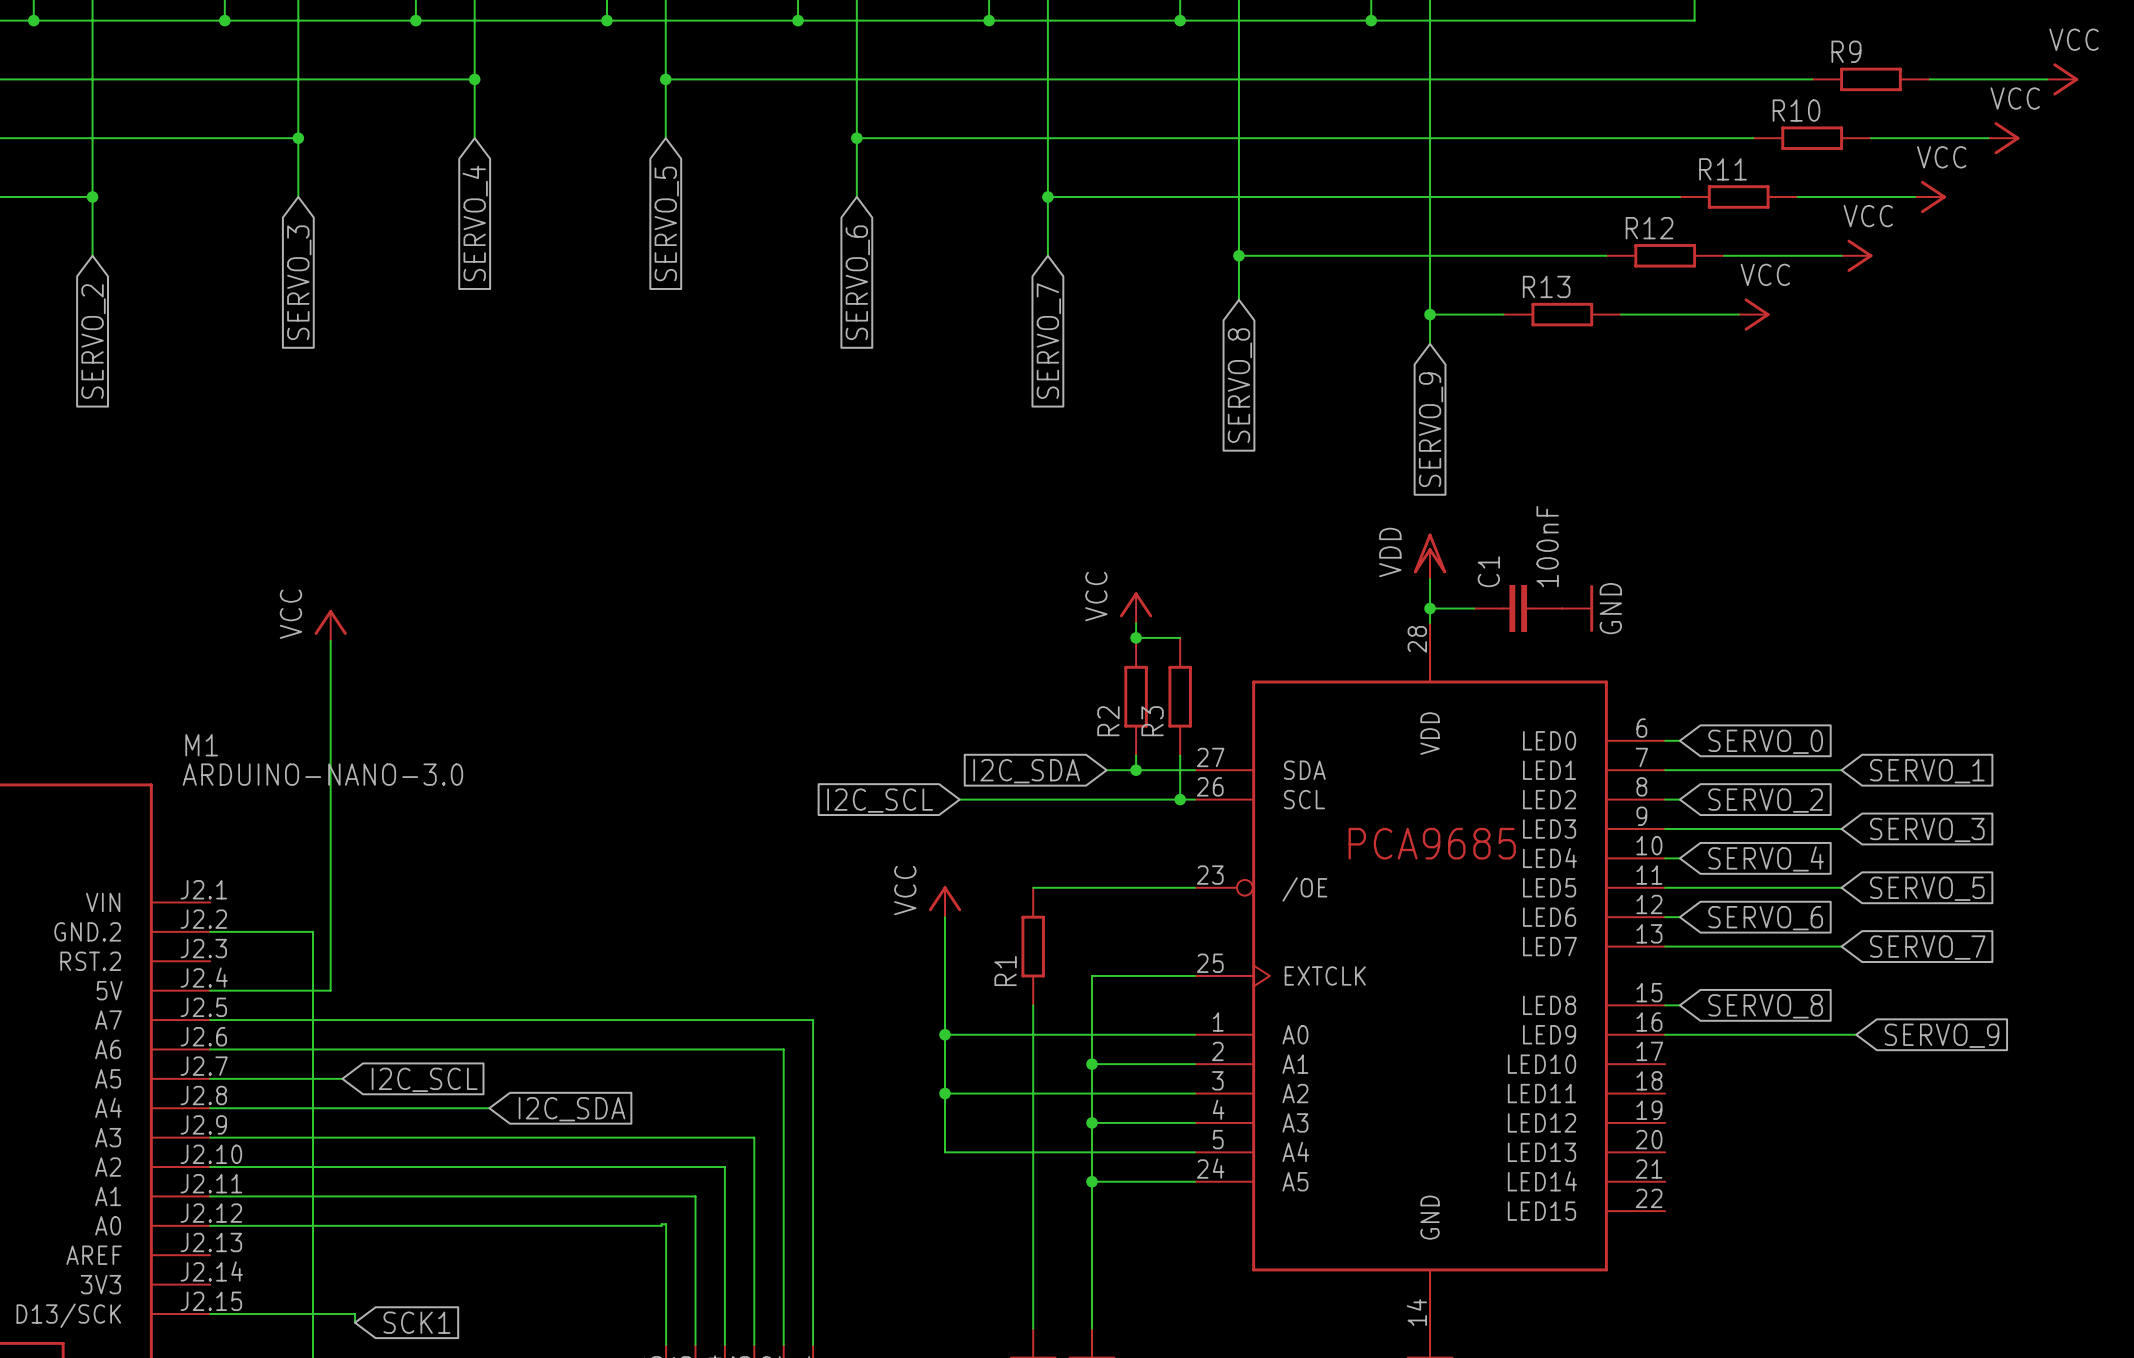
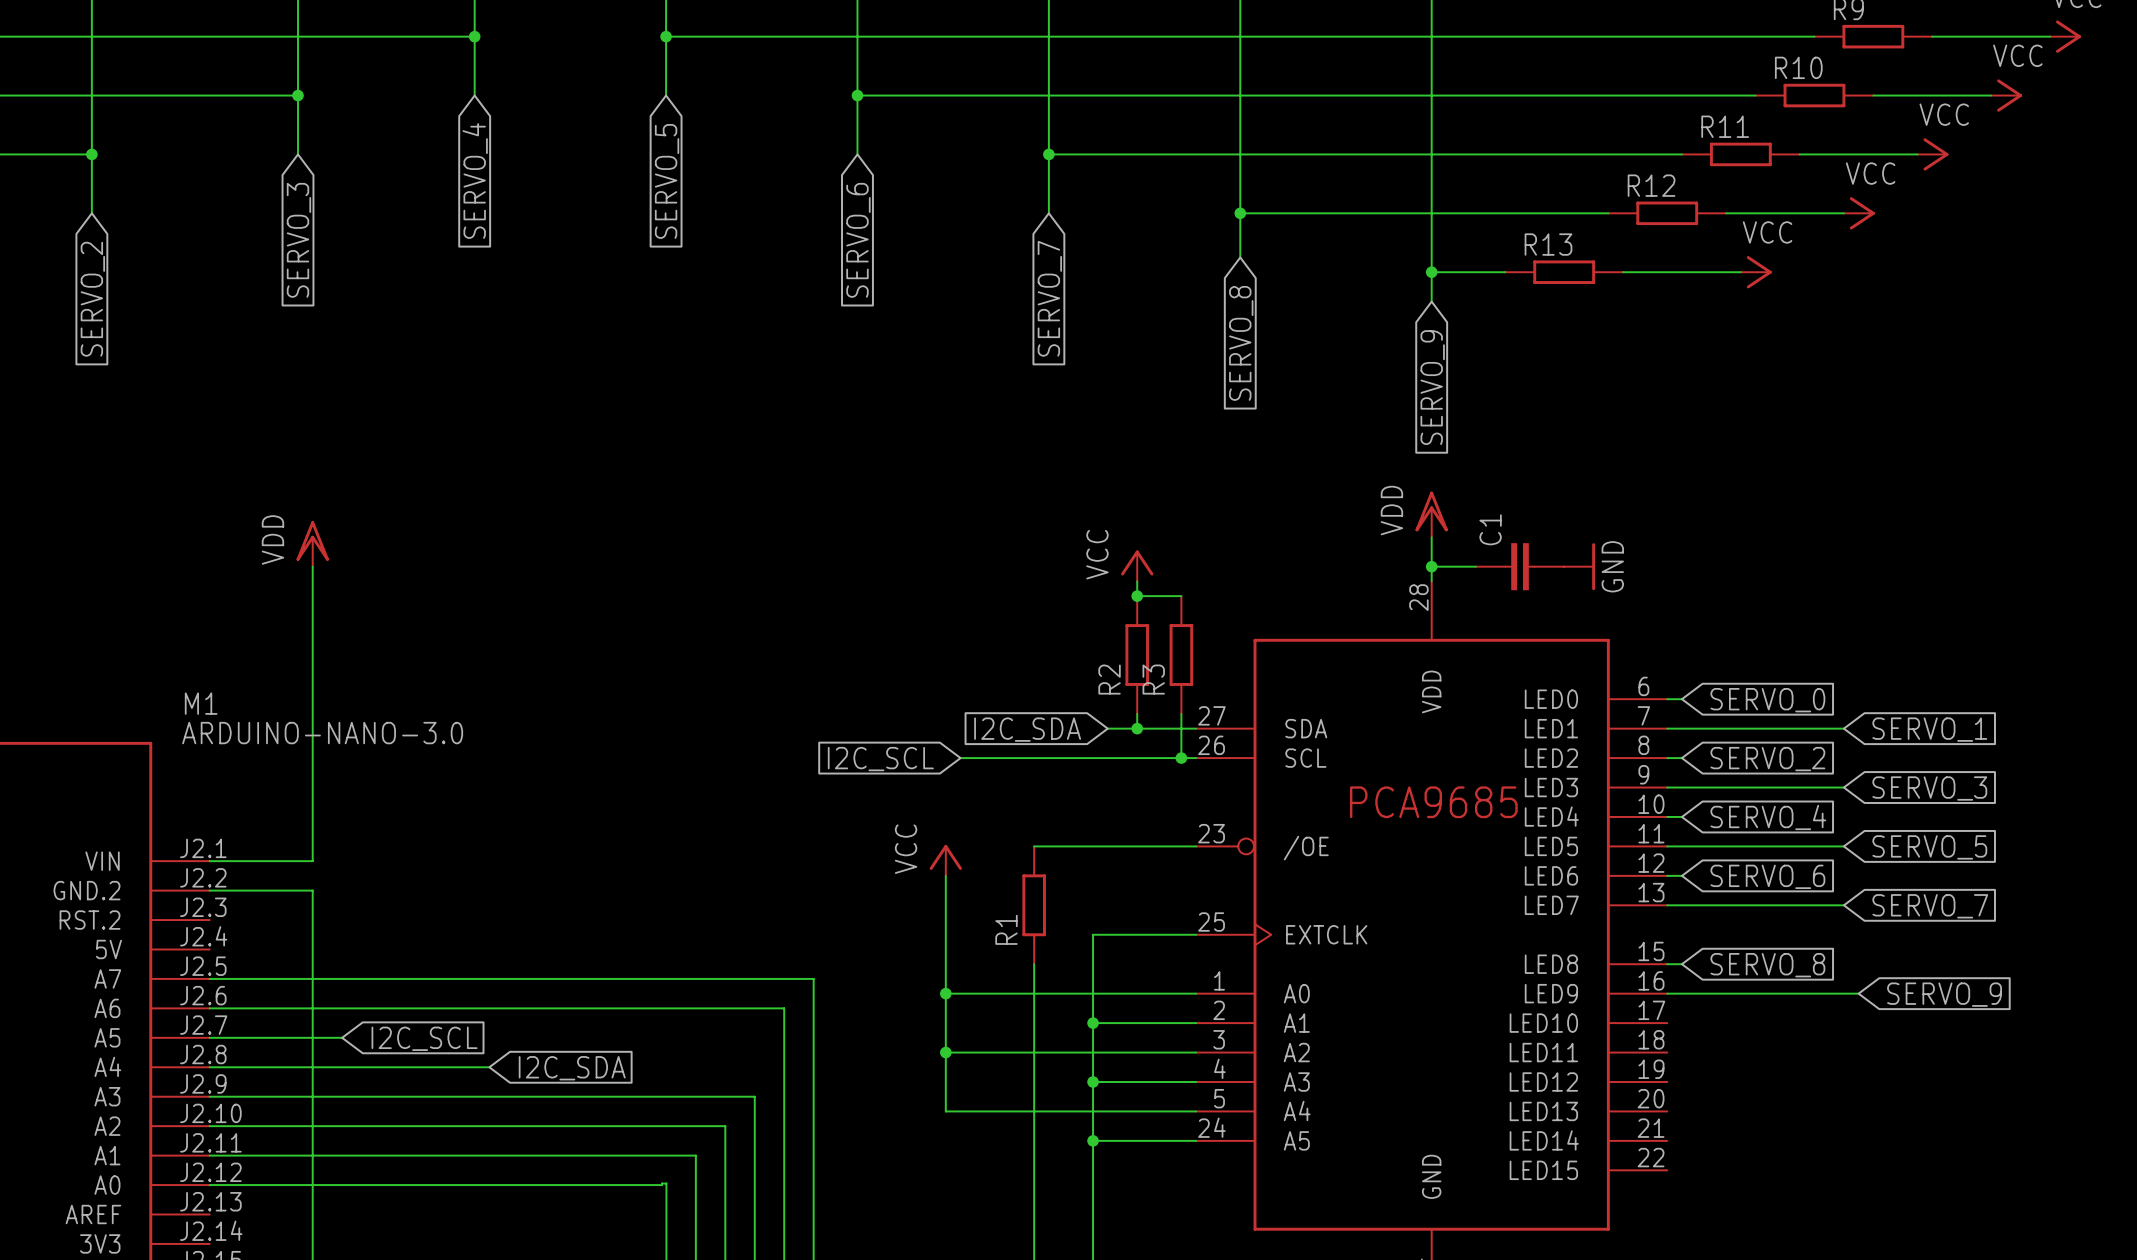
C1 value: 100nF (1547, 546) -> none
power symbol: none -> VDD (312, 543)
wire: none -> (312, 566) (312, 861) (209, 861)
power symbol: VCC (330, 625) -> none
wire: (330, 640) (330, 990) (210, 990) -> none

